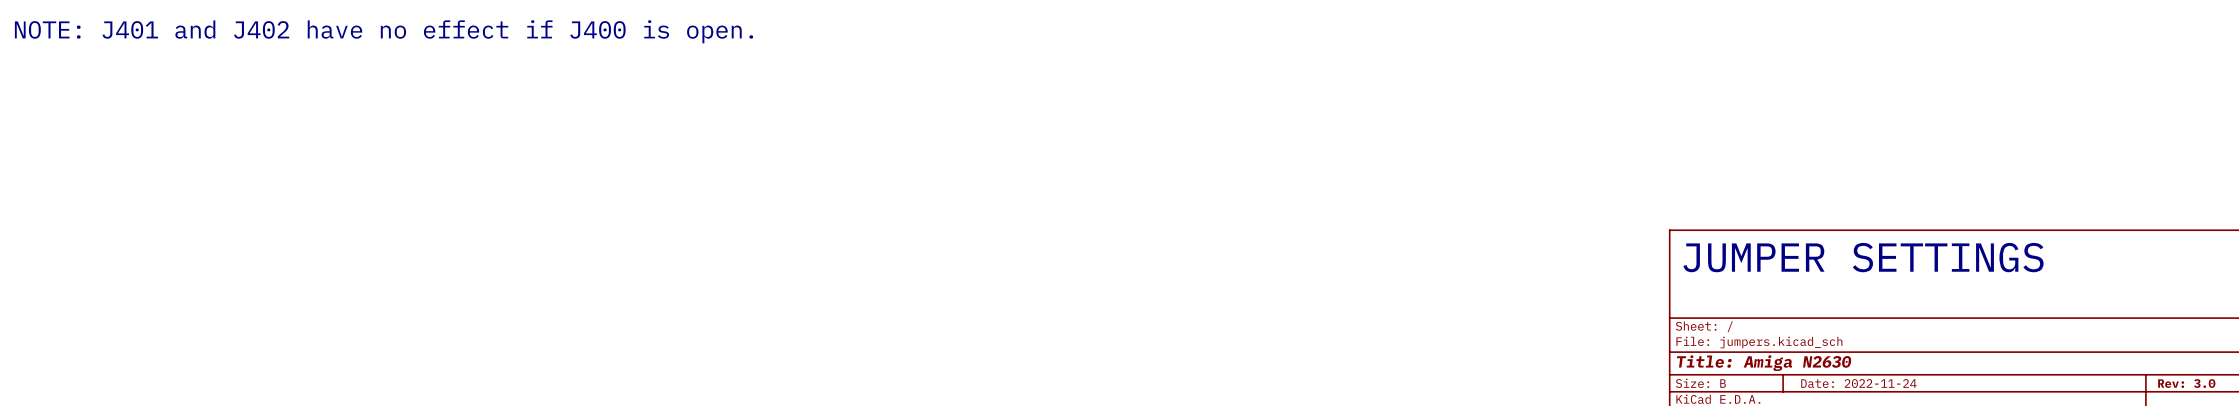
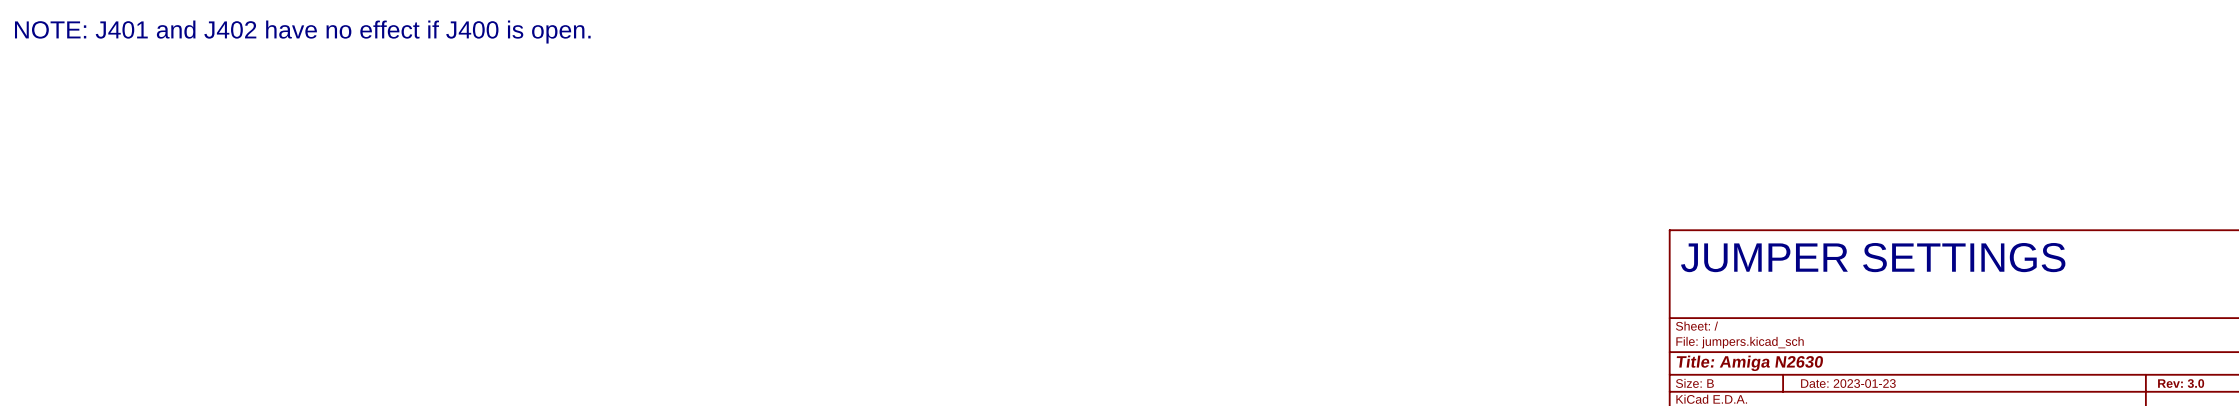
title block: Date: 2022-11-24 (1858, 383) -> Date: 2023-01-23 (1848, 383)

